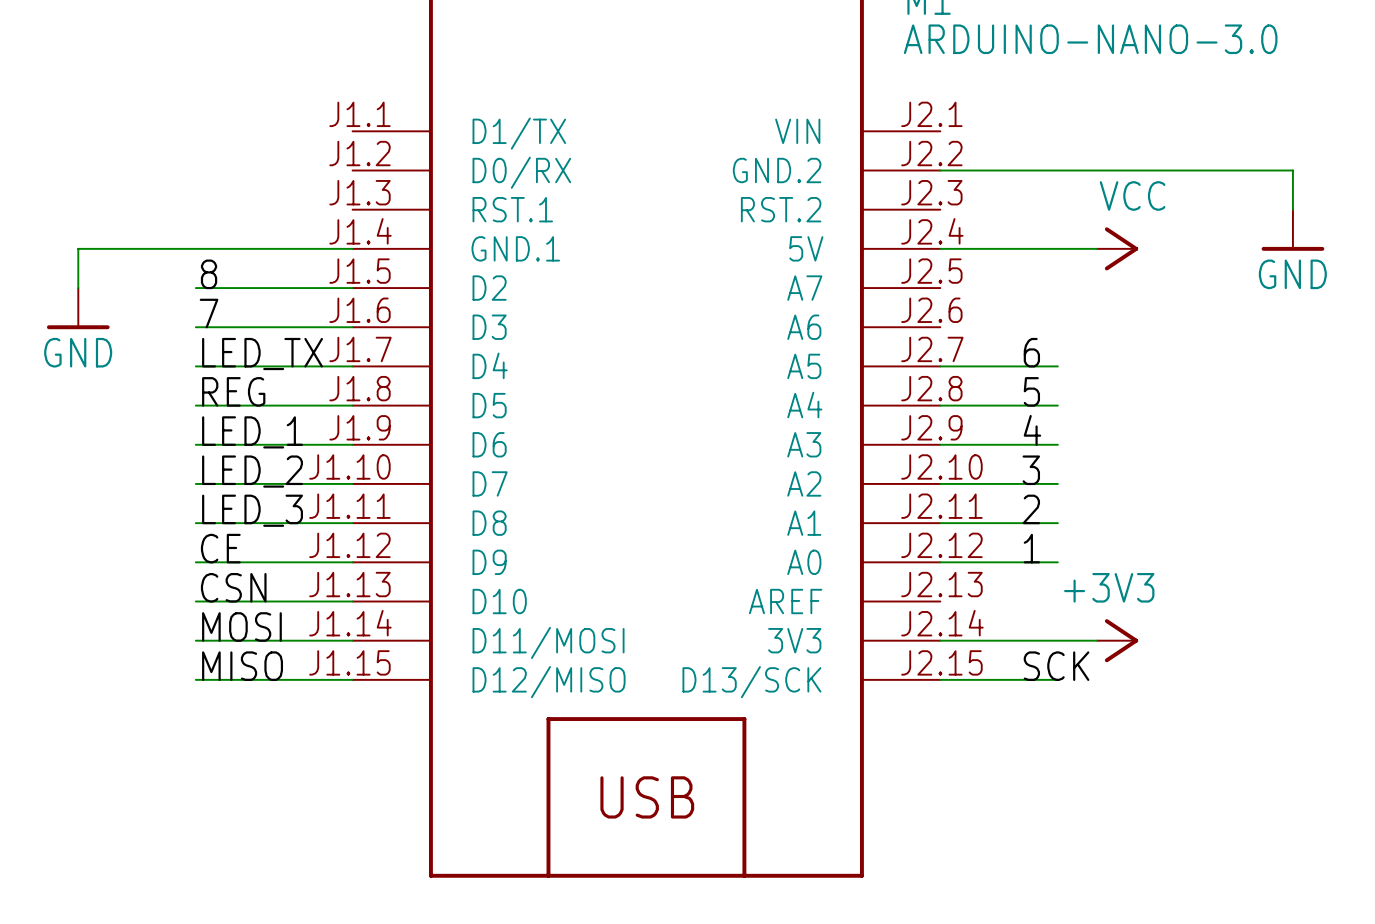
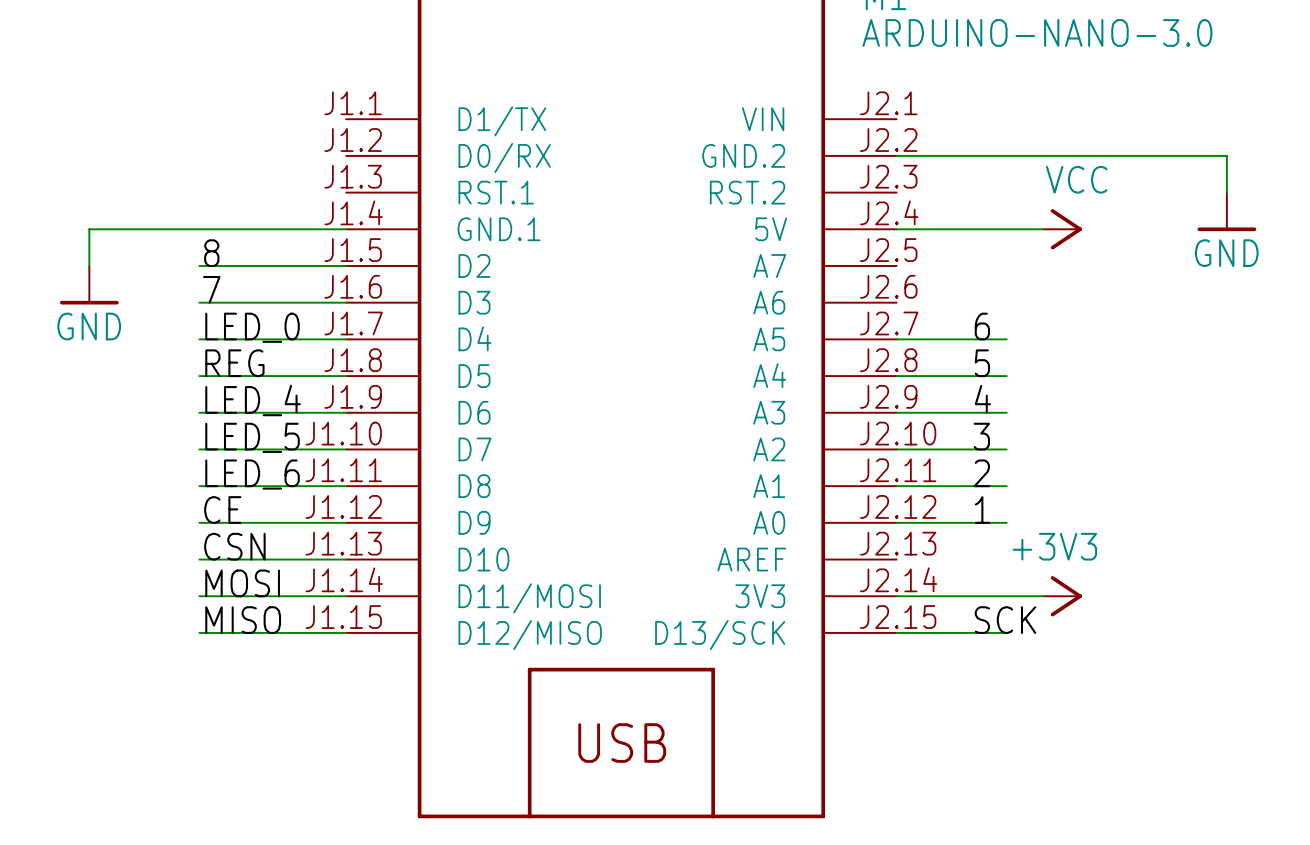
label: LED_TX (262, 354) -> LED_0 (252, 327)
label: LED_1 (252, 432) -> LED_4 (253, 400)
label: LED_2 (252, 471) -> LED_5 (252, 437)
label: LED_3 (252, 510) -> LED_6 (252, 474)

